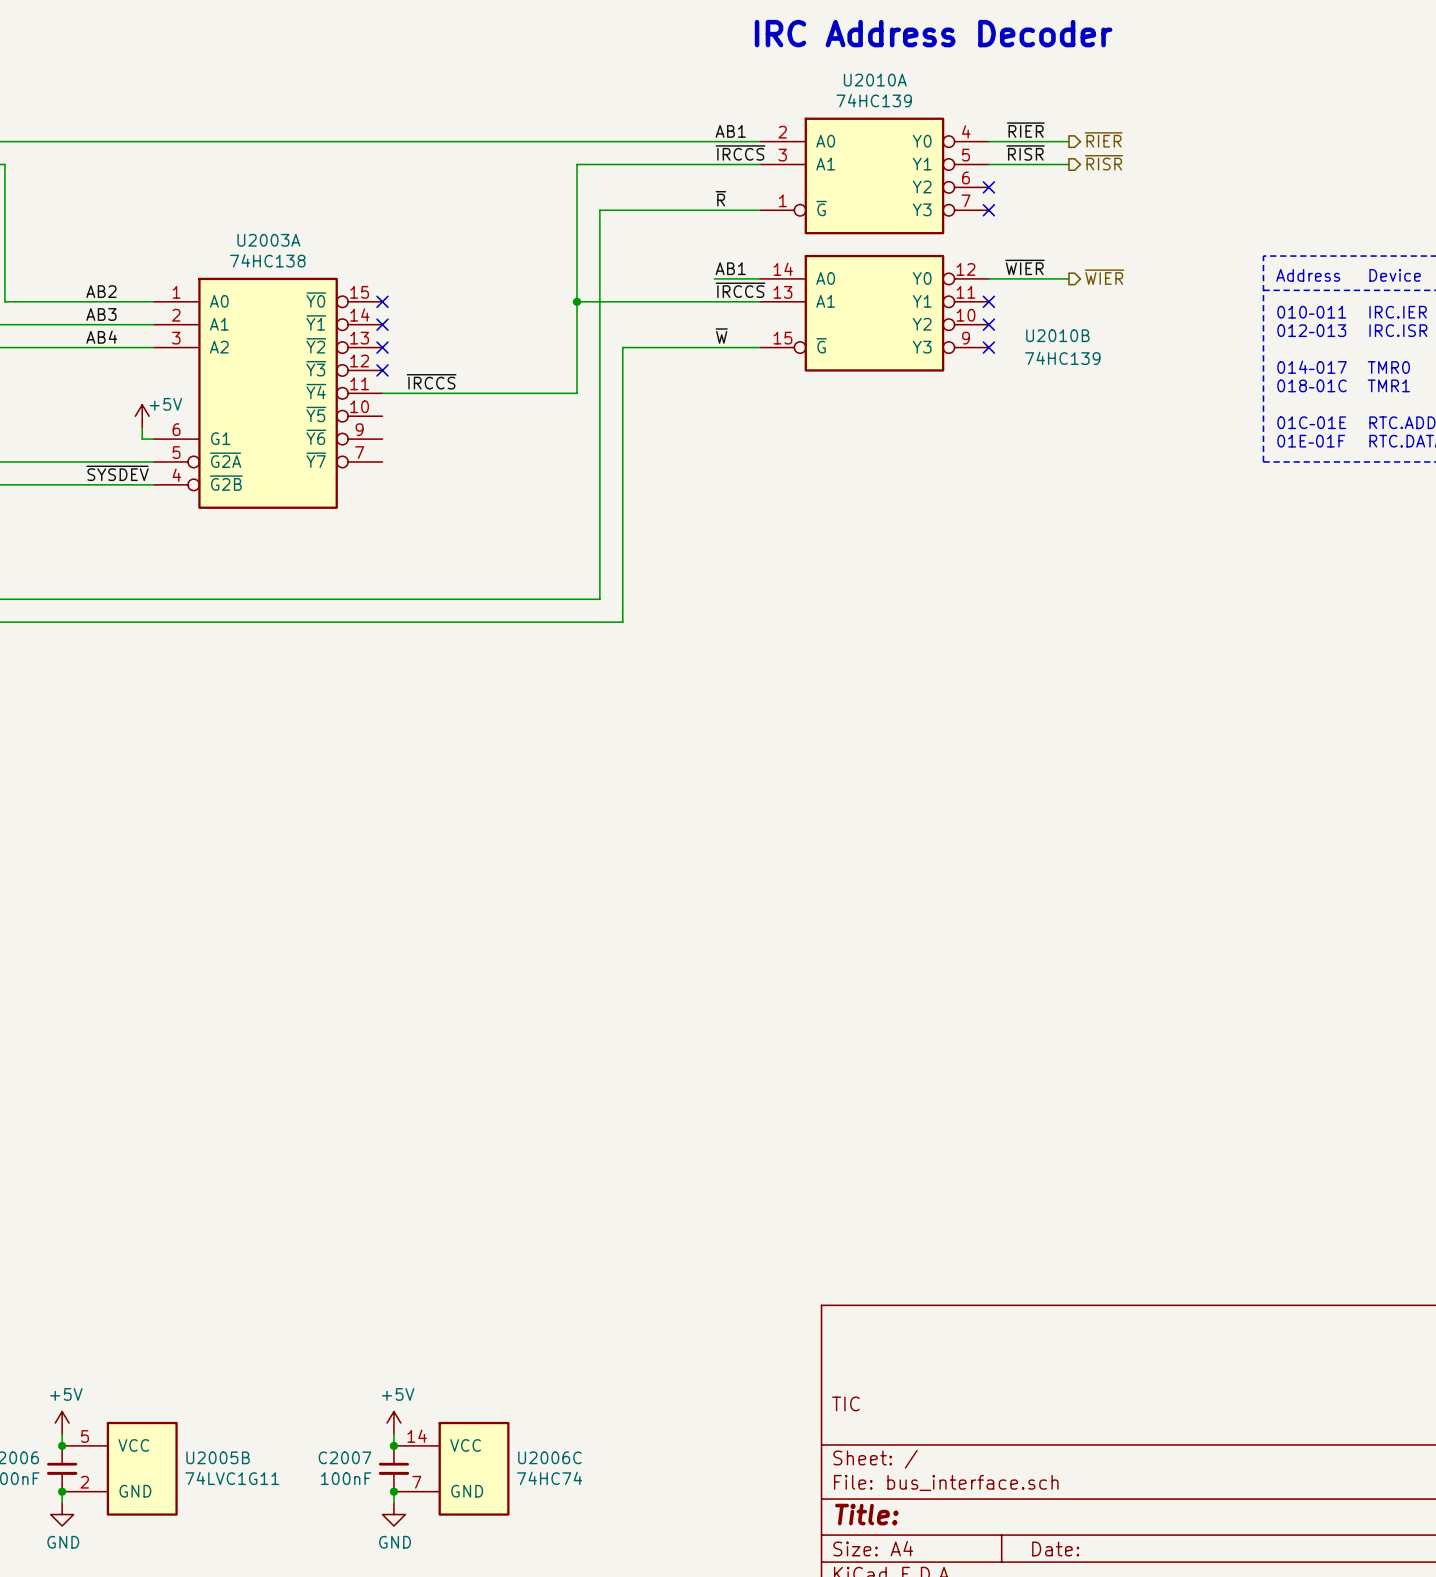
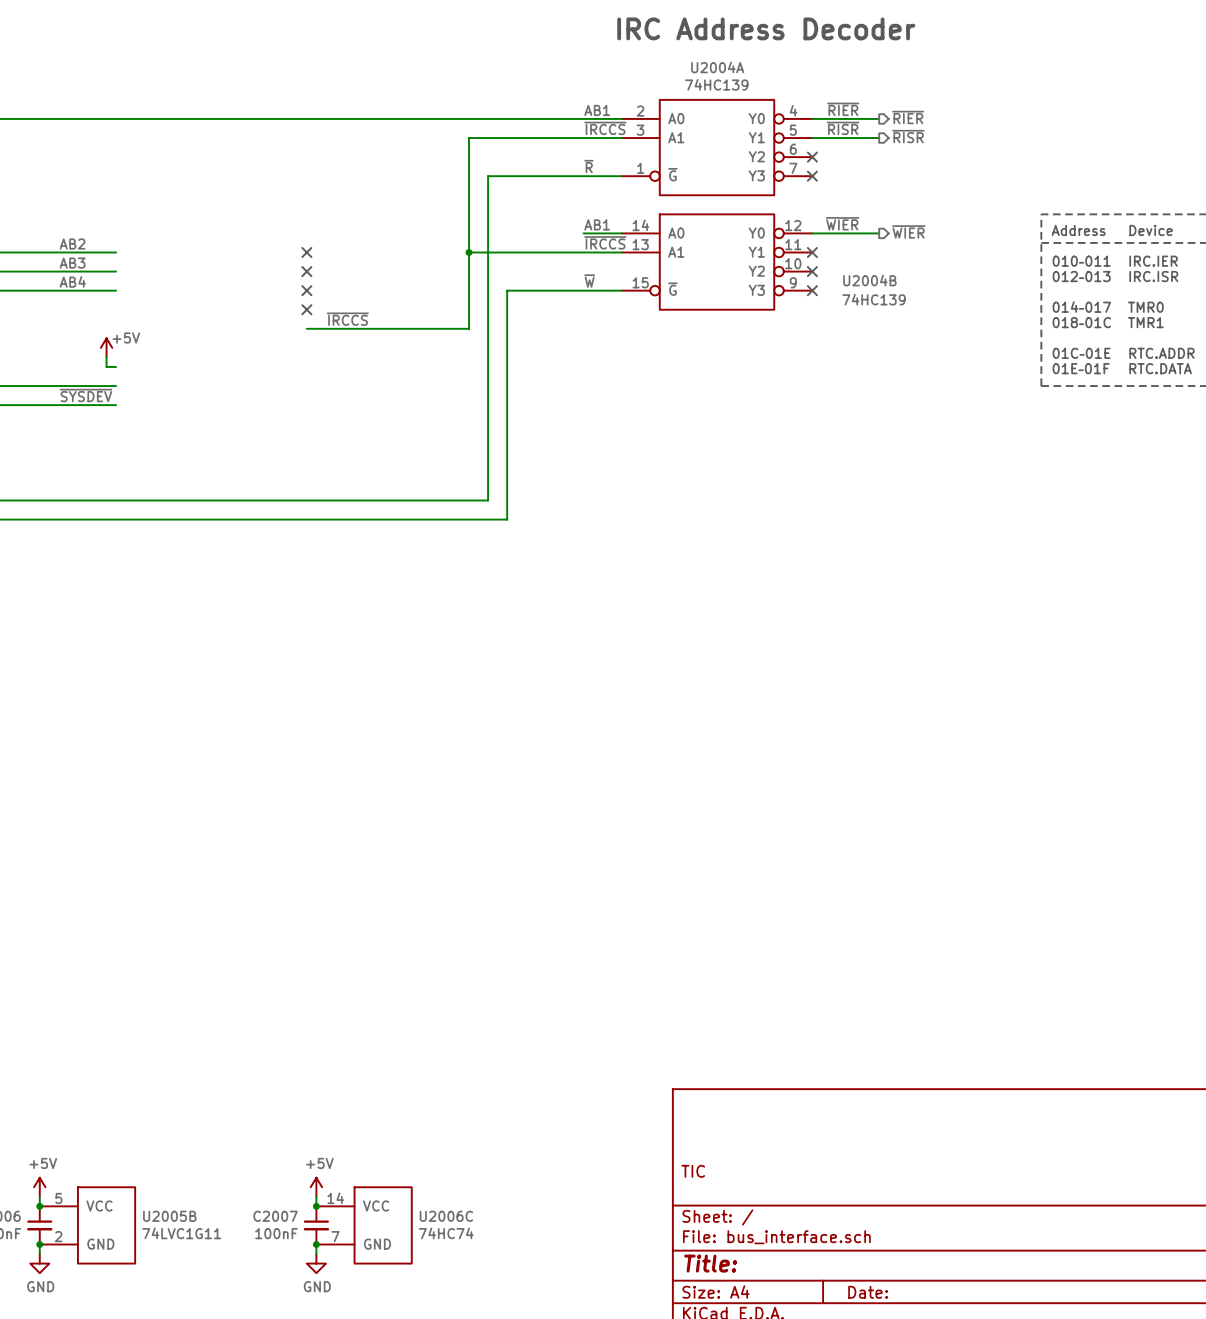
U2010A name: U2010A (875, 80) -> U2004A (717, 67)
U2010B name: U2010B (1057, 335) -> U2004B (869, 280)
U2003A: 74HC138 (268, 393) -> none

